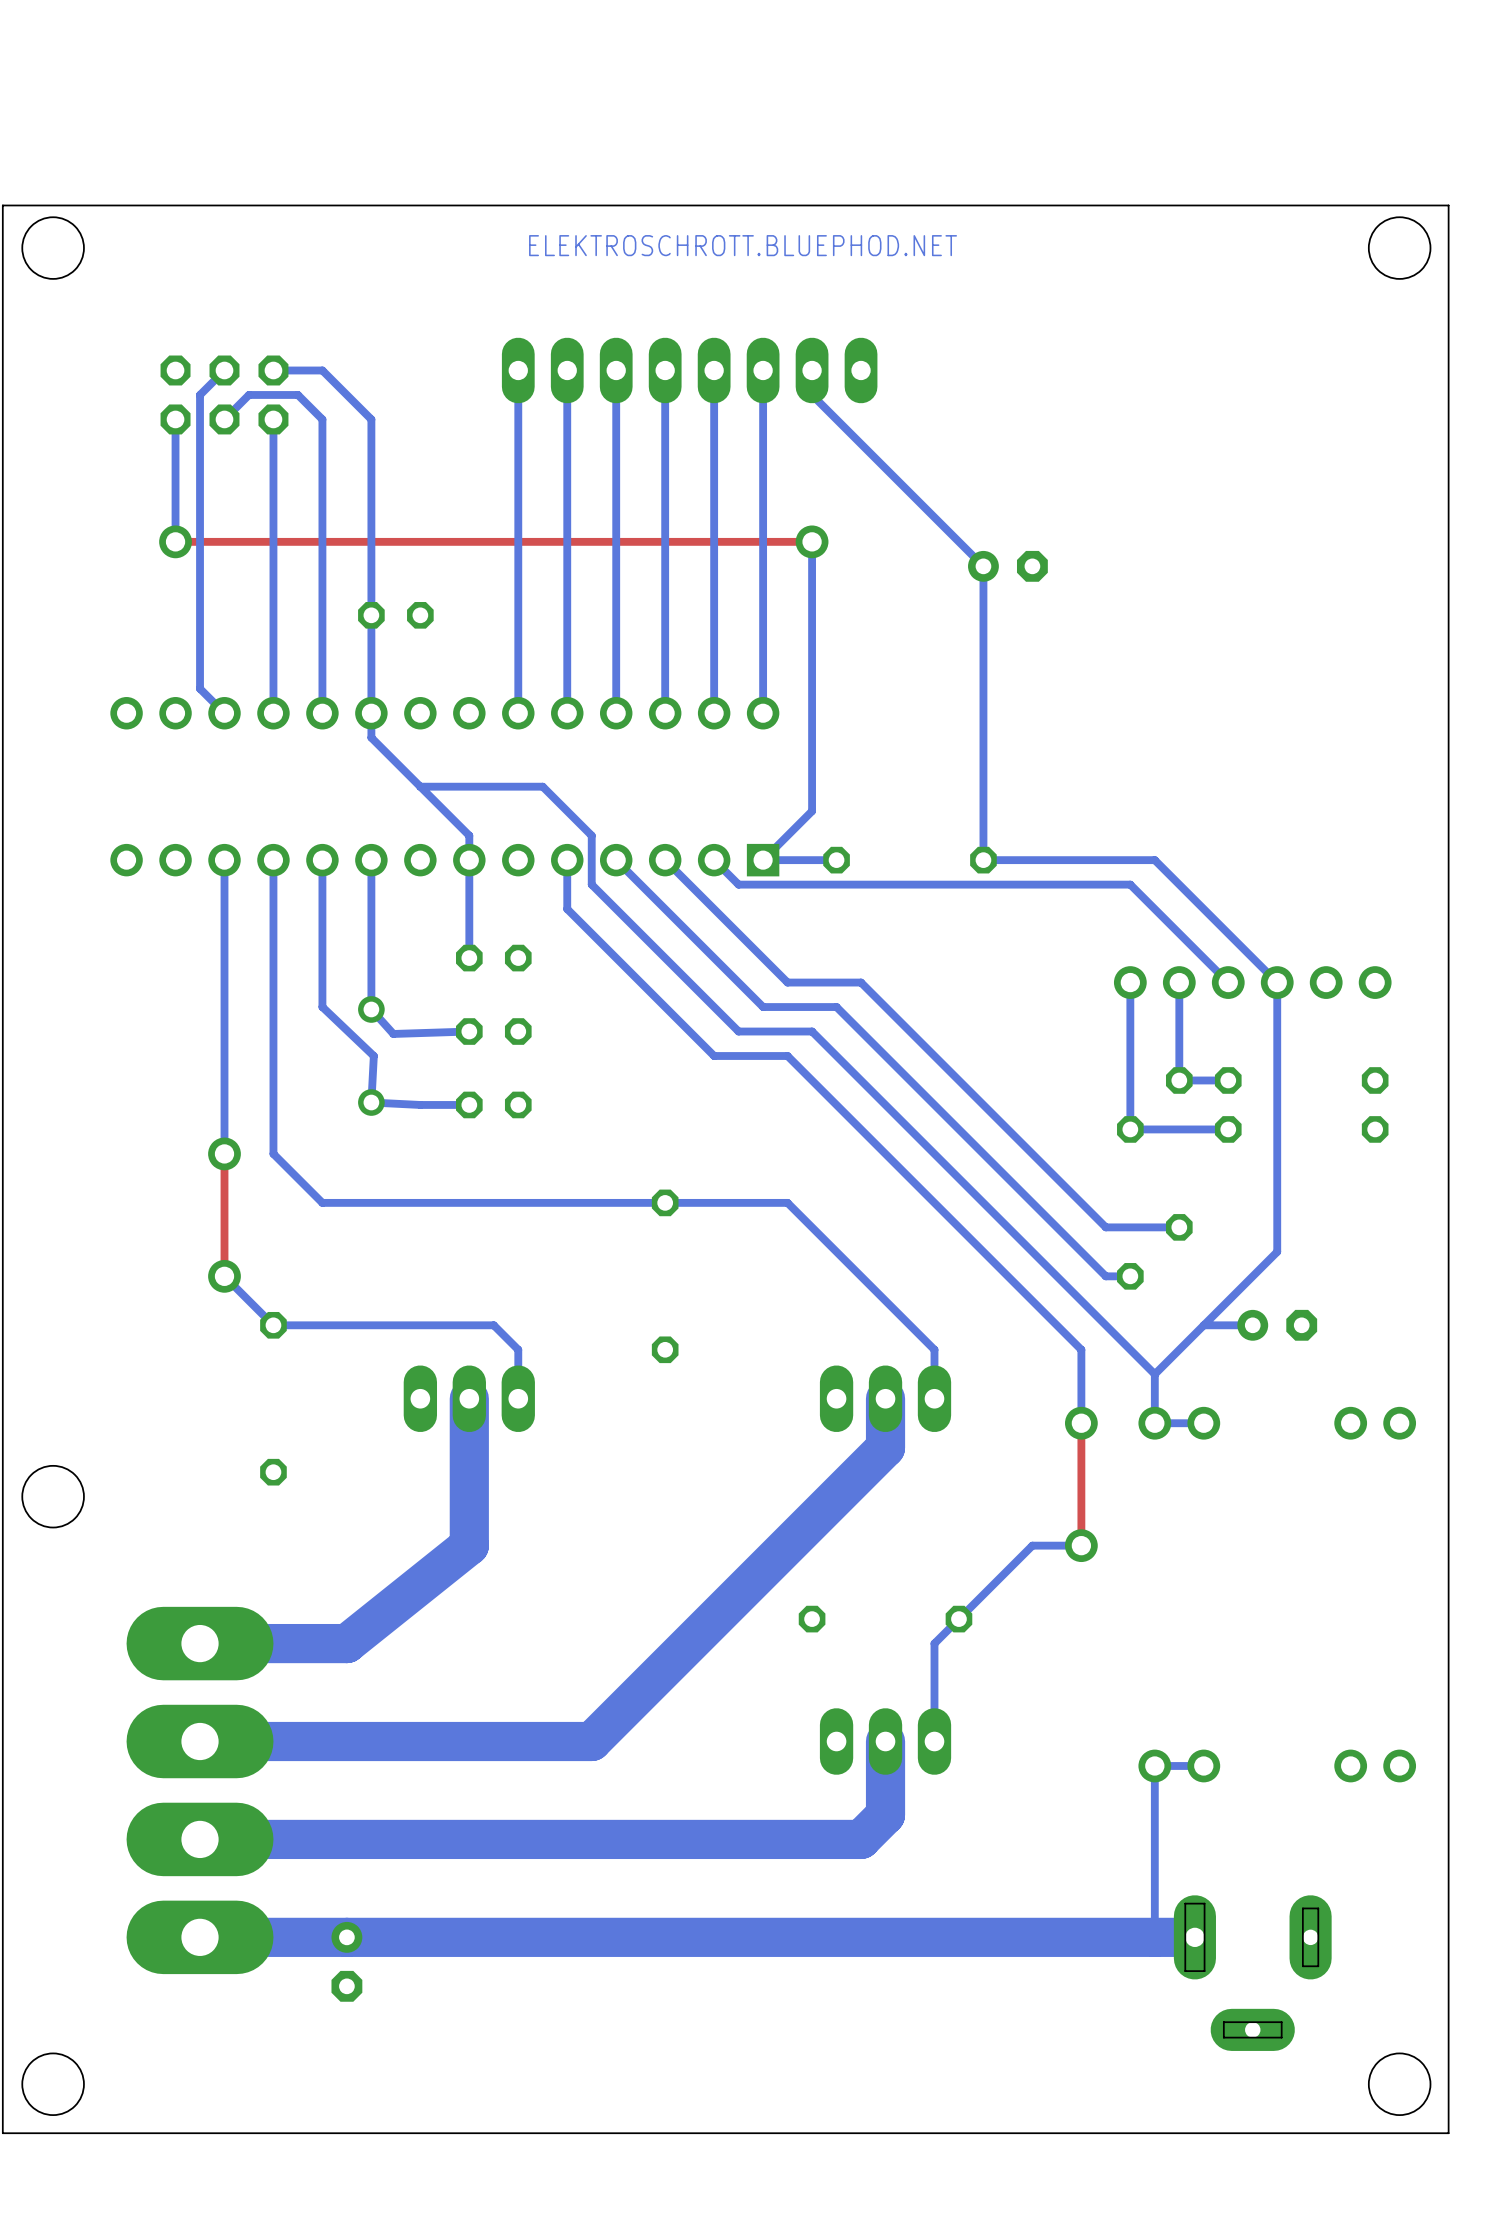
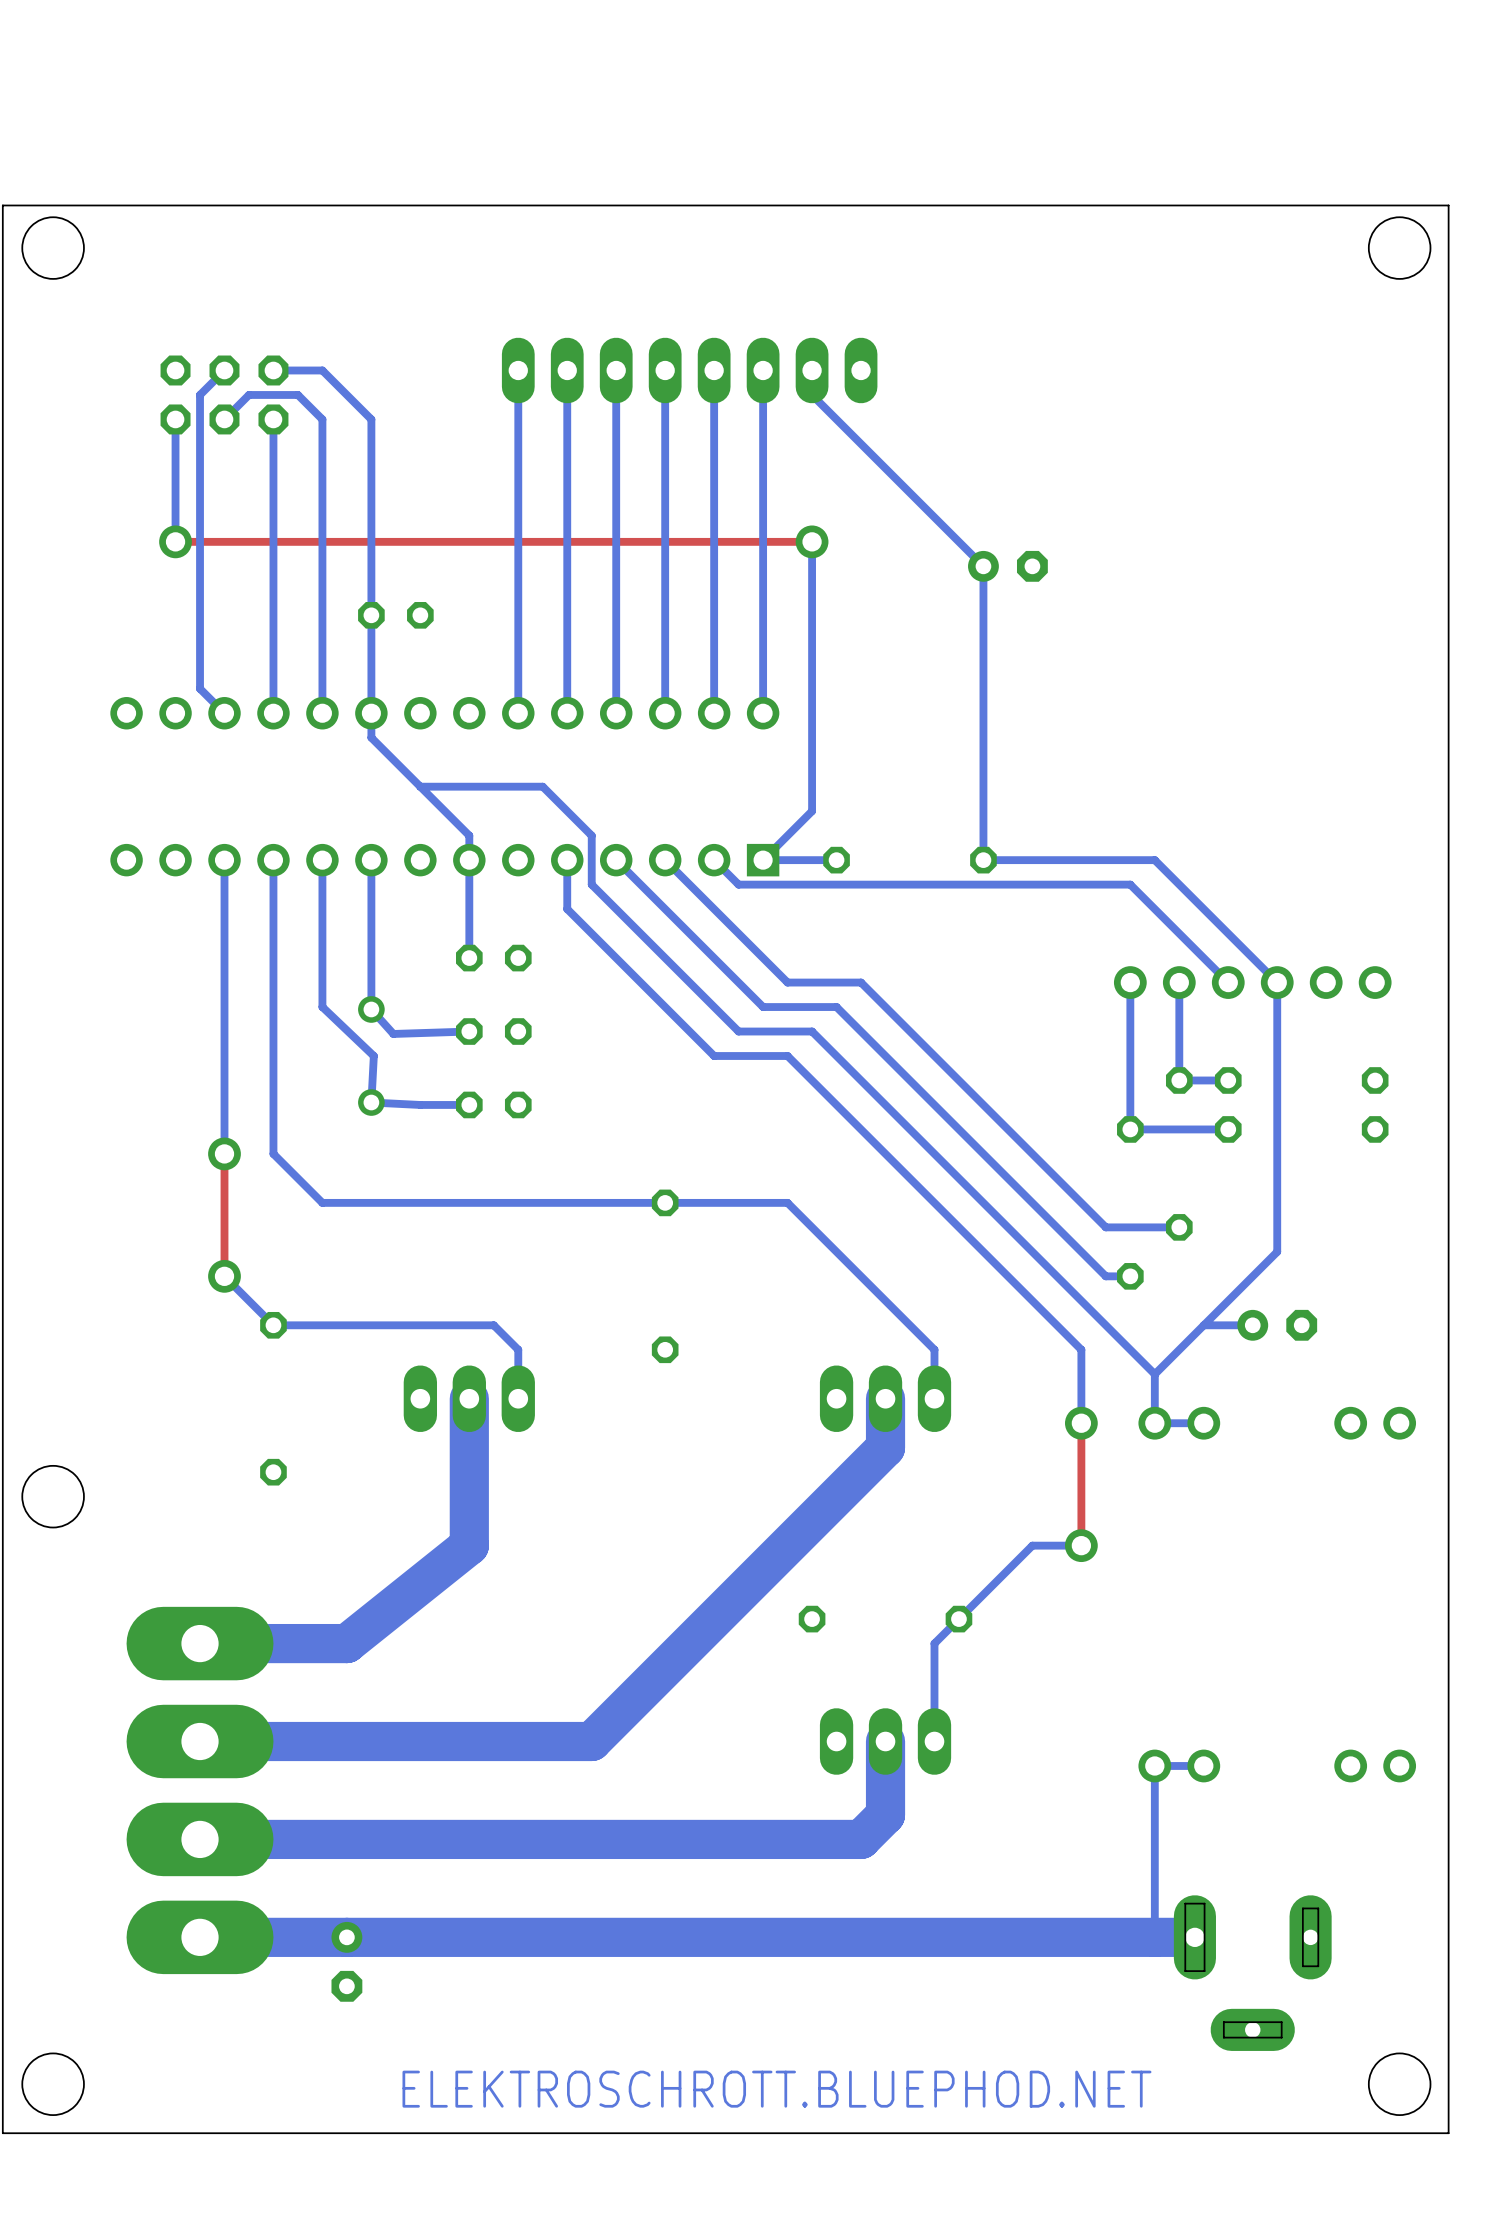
text: ELEKTROSCHROTT.BLUEPHOD.NET (743, 245) -> none
text: none -> ELEKTROSCHROTT.BLUEPHOD.NET (776, 2089)

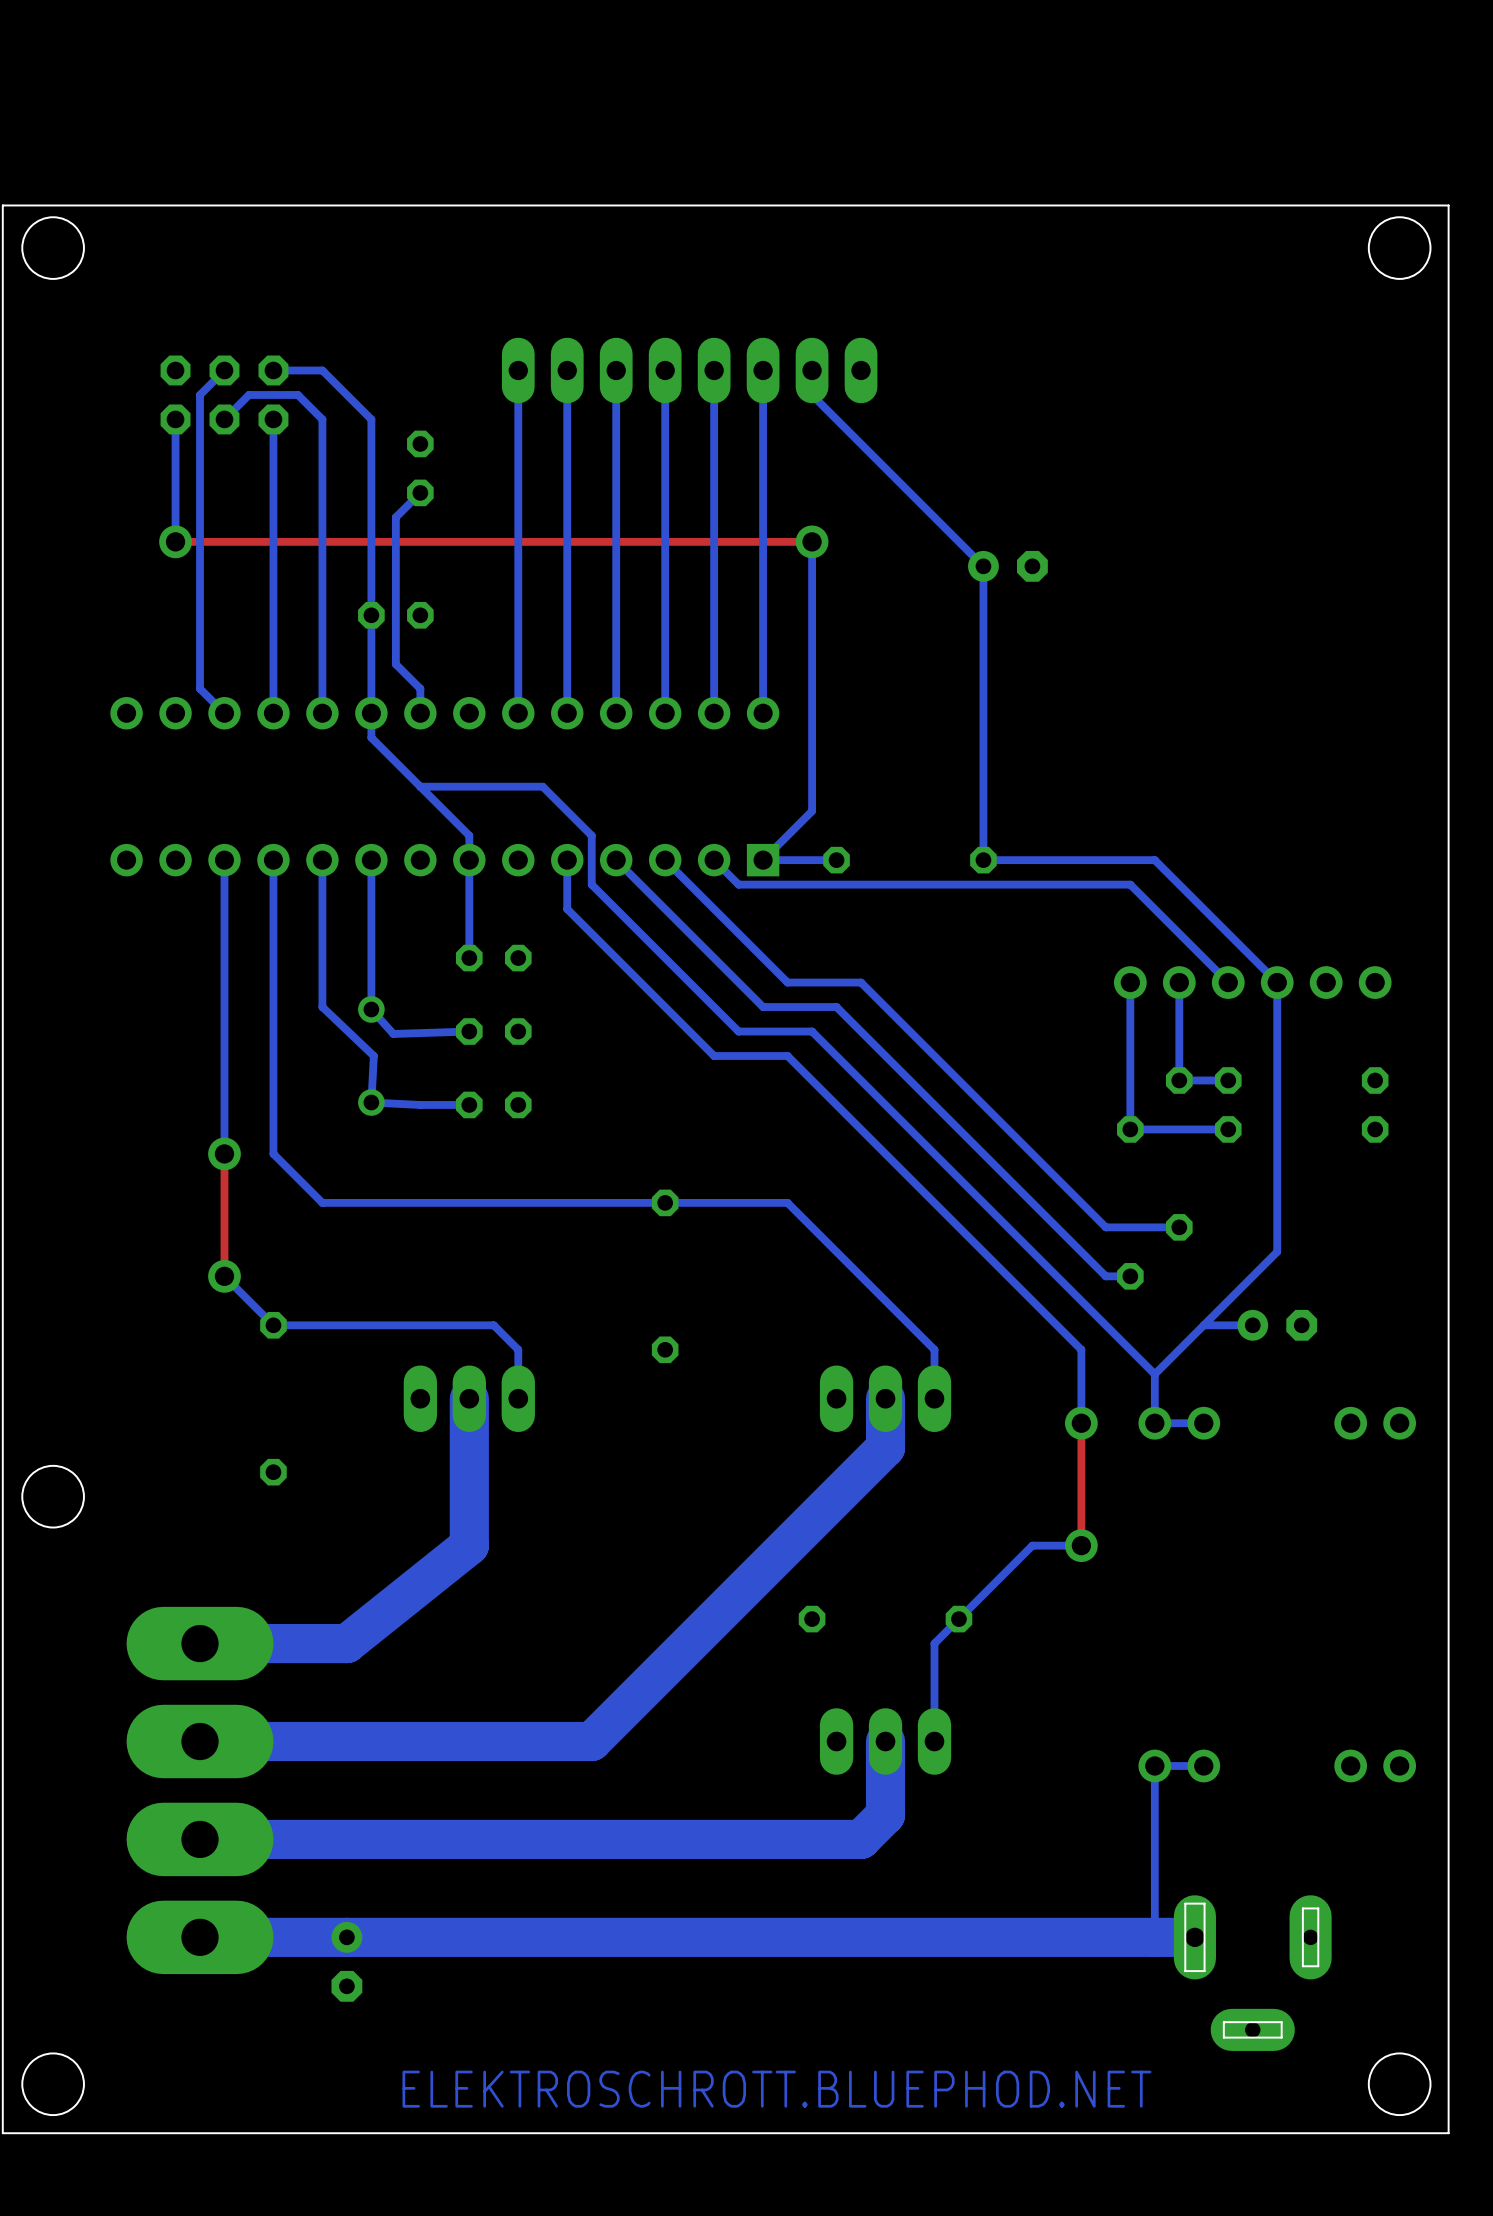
part: none -> (420, 468)
bottom track: none -> (420, 492) (395, 517) (395, 664) (420, 688) (420, 713)

